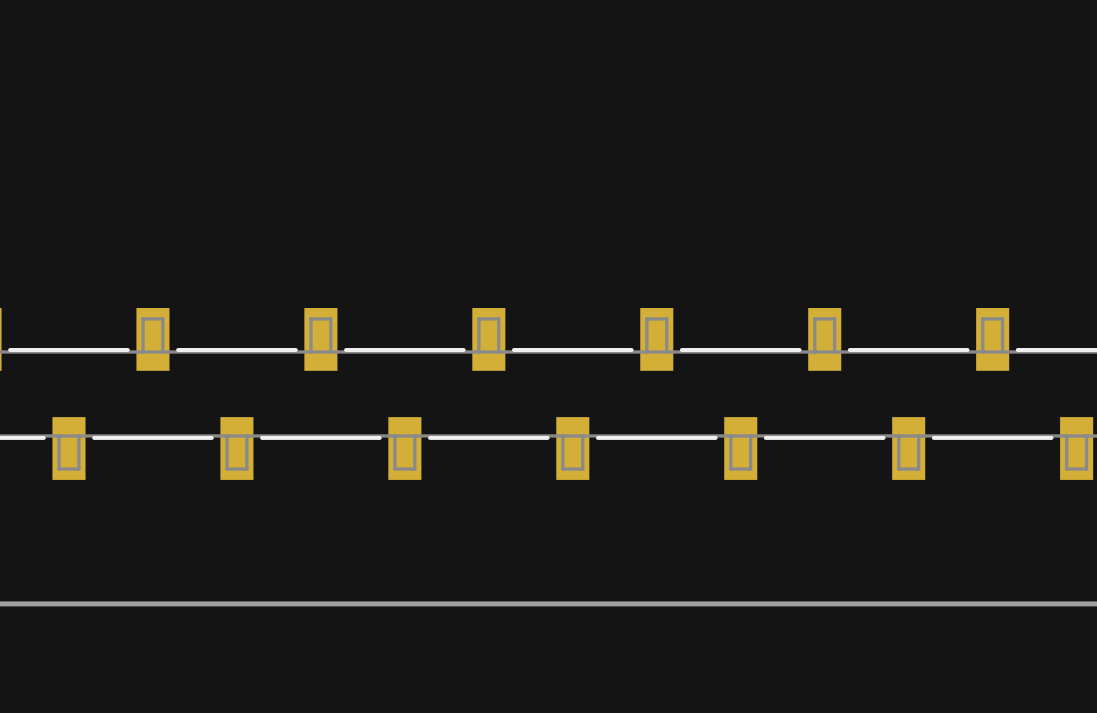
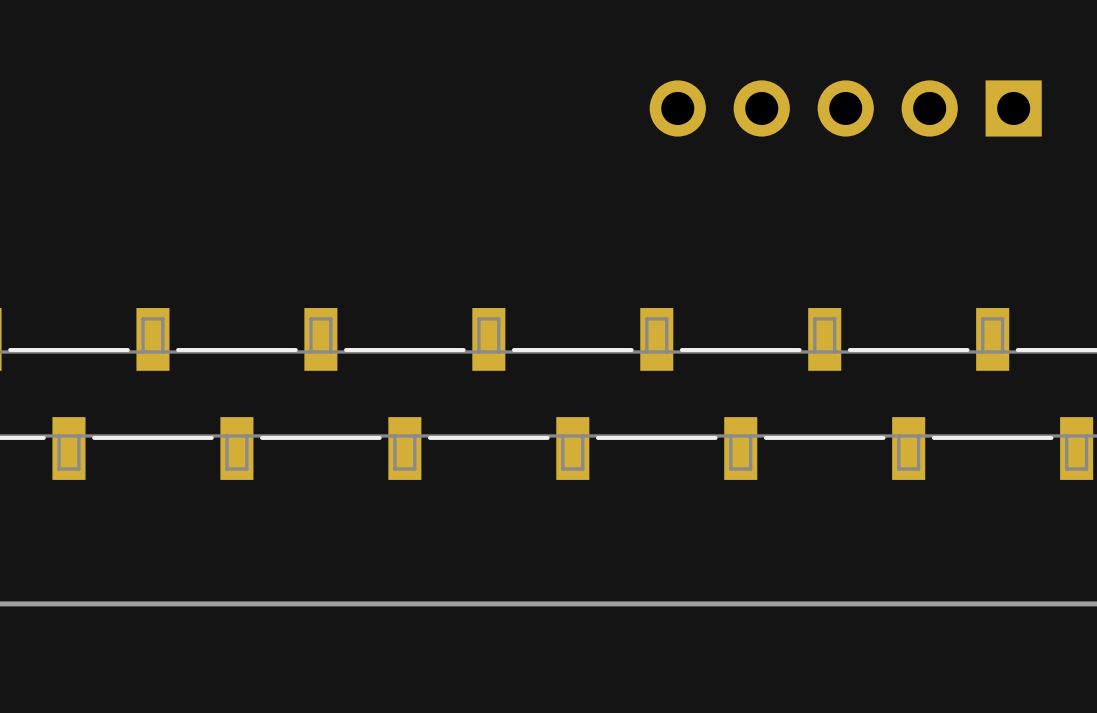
part: none -> (845, 108)

